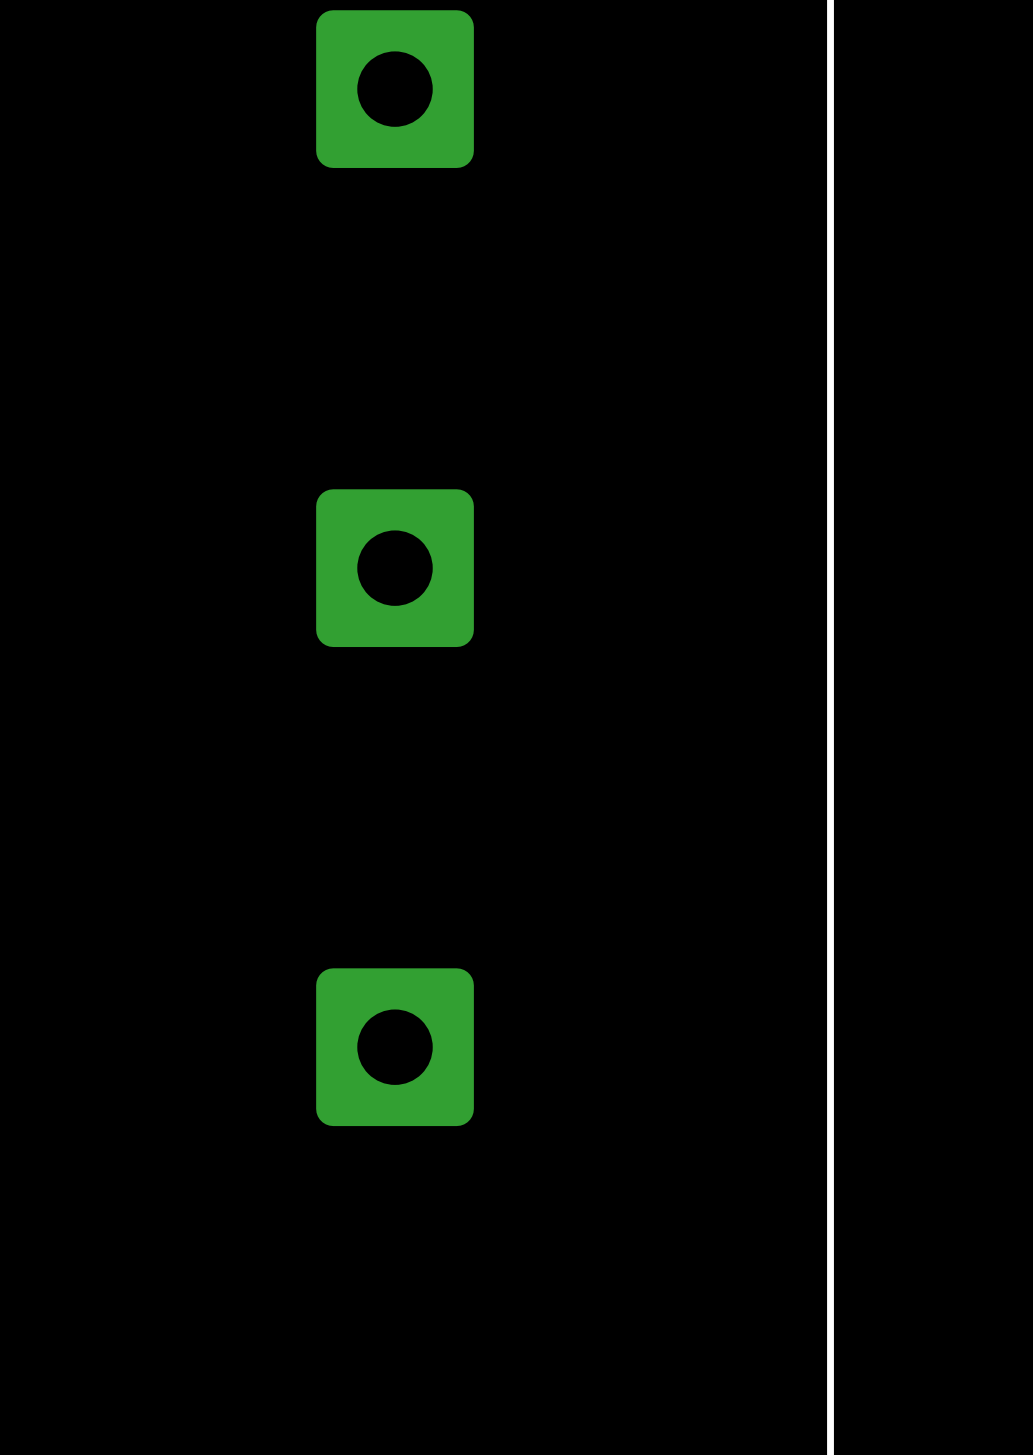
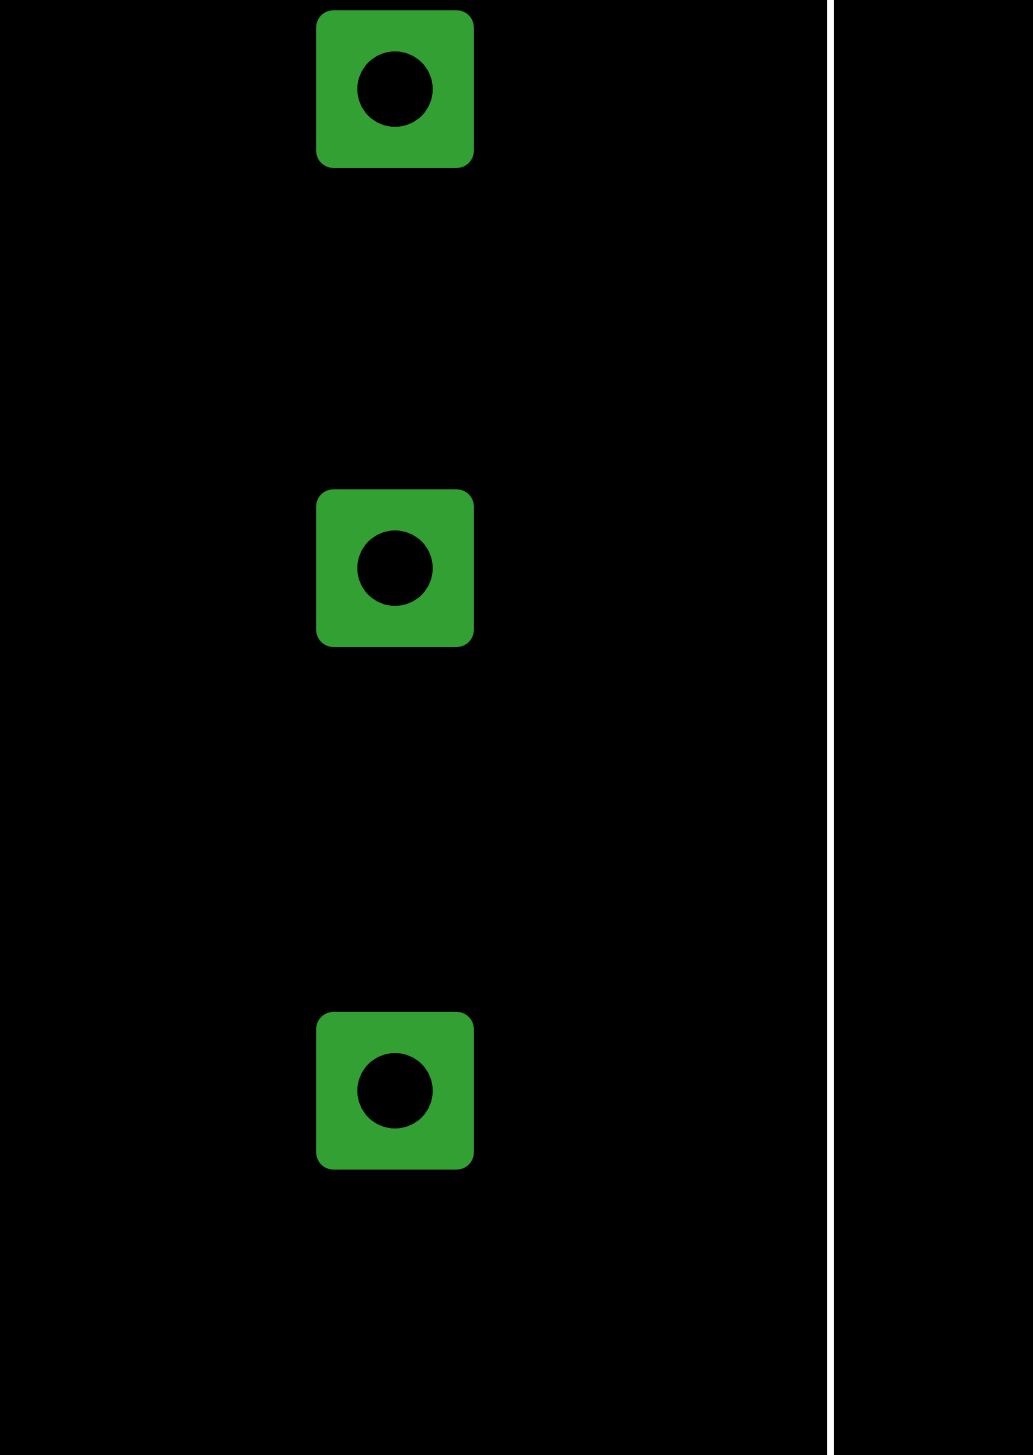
part position: (395, 1047) -> (395, 1090)

